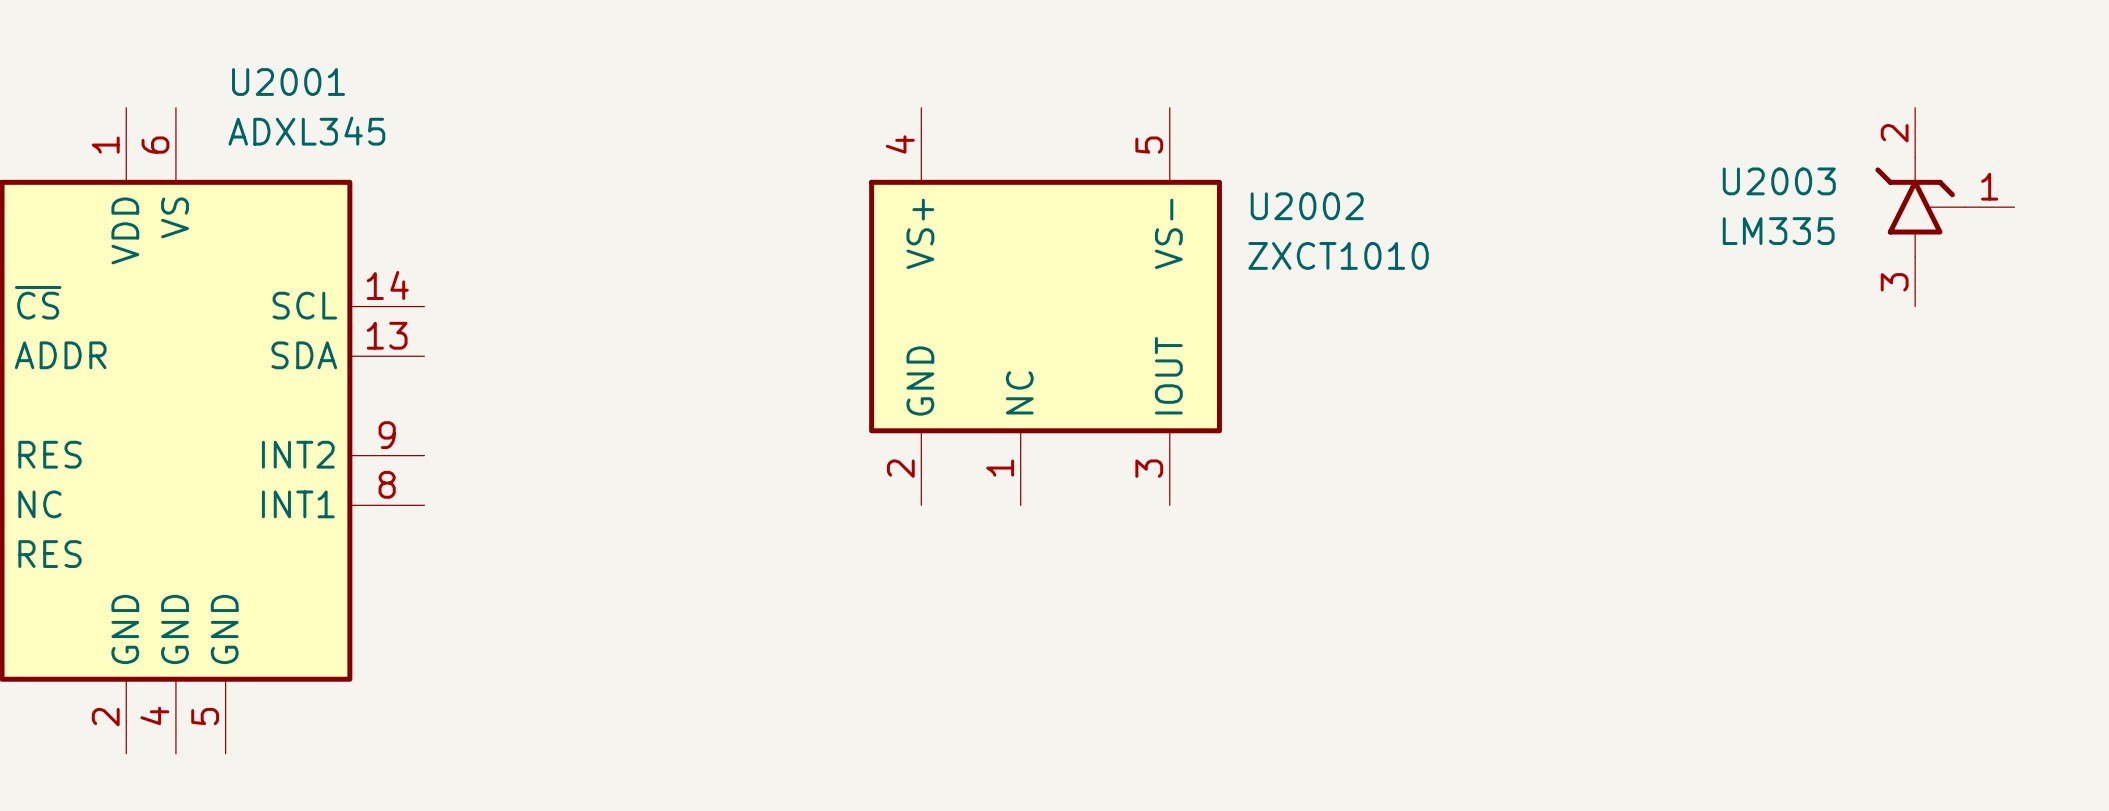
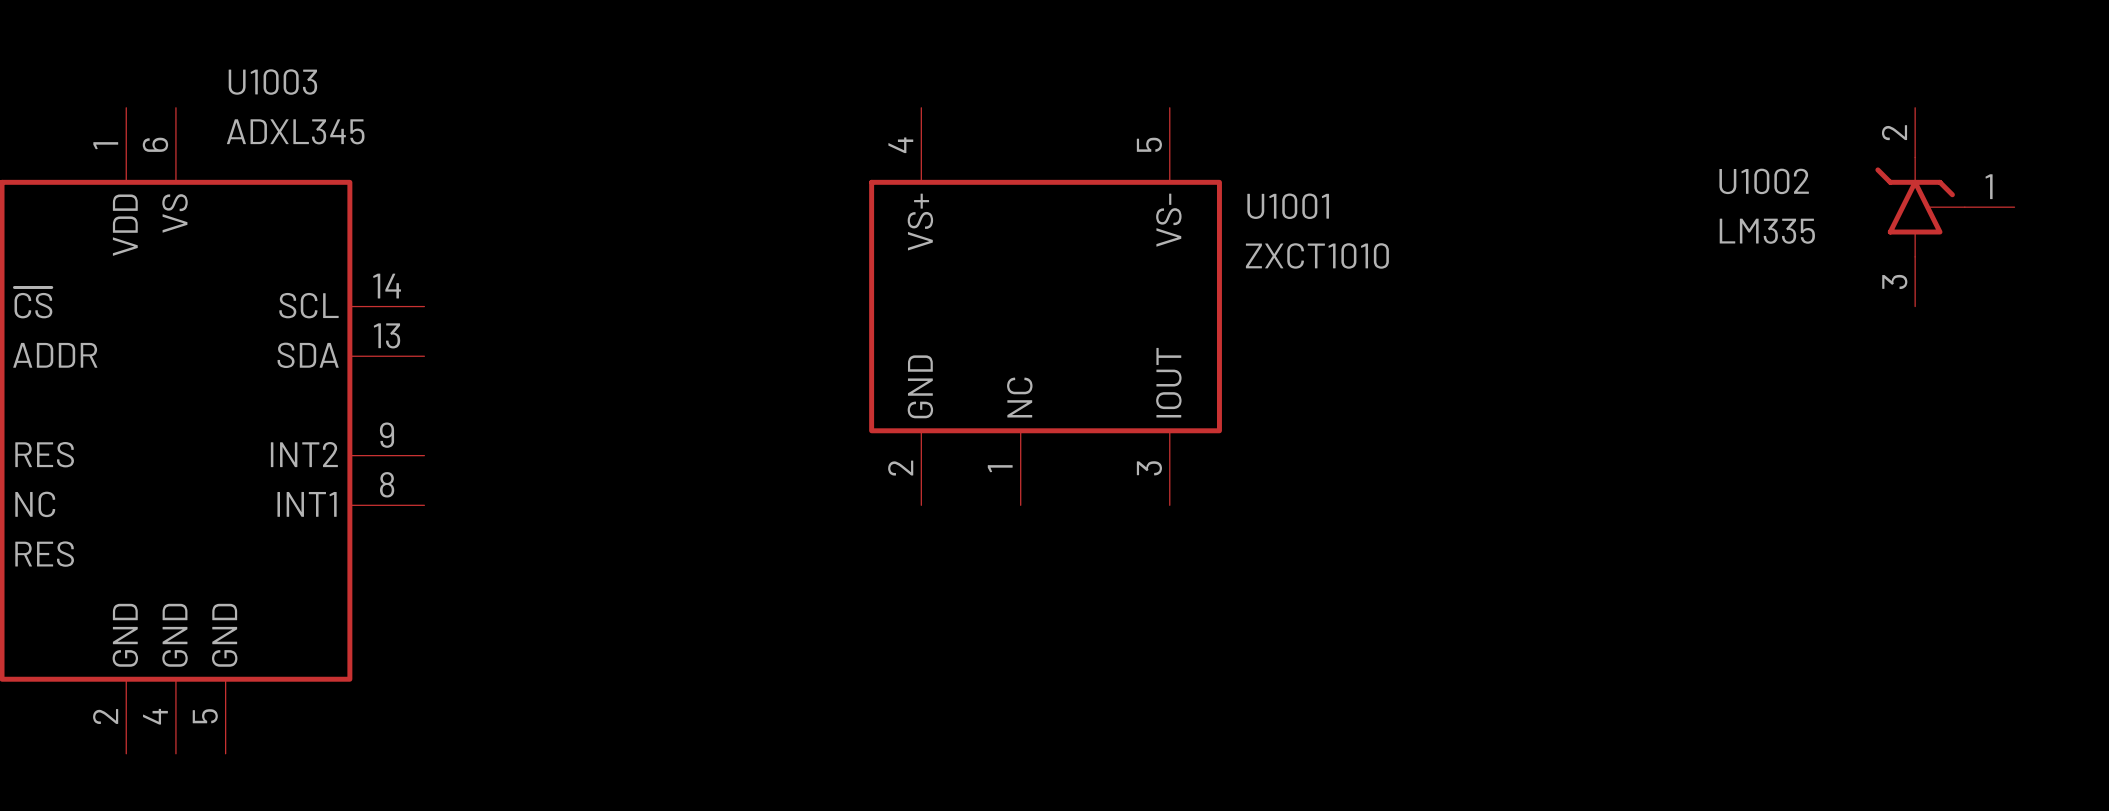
U2001 name: U2001 (288, 82) -> U1003 (272, 82)
U2003 name: U2003 (1779, 181) -> U1002 (1764, 181)
U2002 name: U2002 (1307, 206) -> U1001 (1288, 206)

